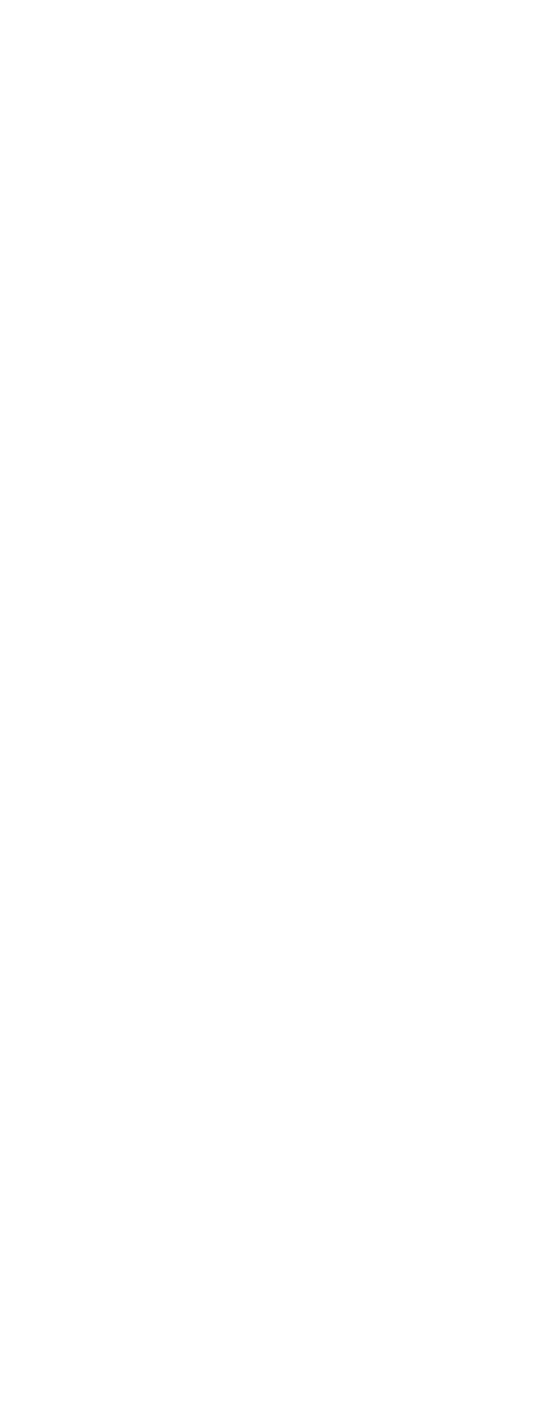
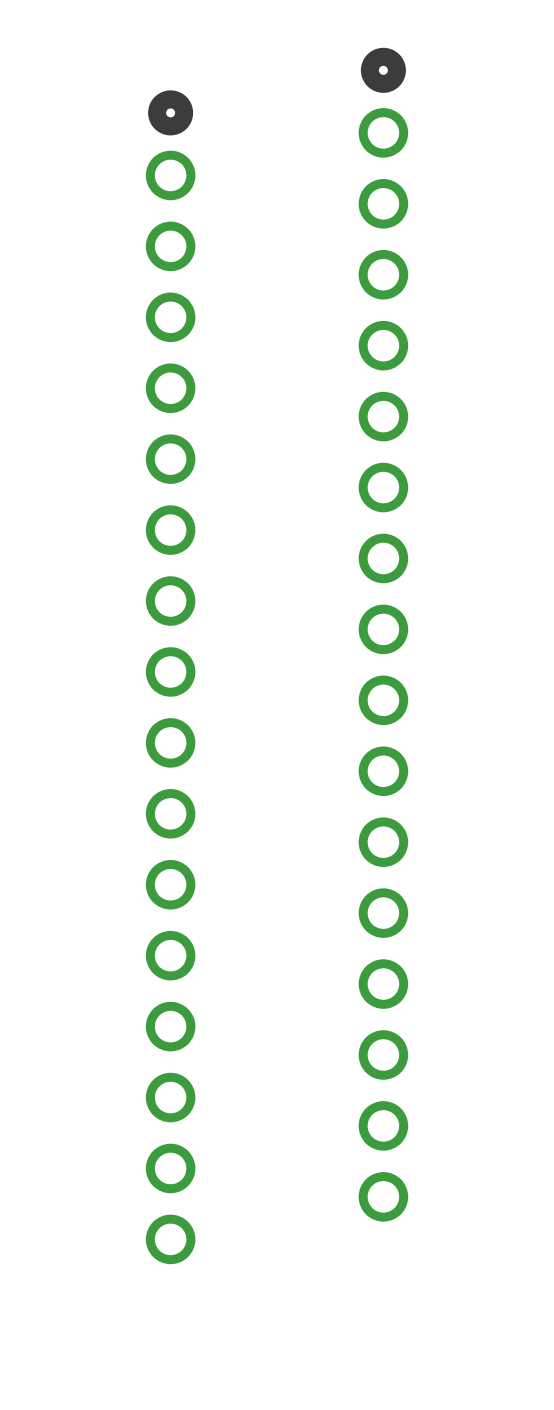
part: none -> (383, 634)
part: none -> (170, 677)

